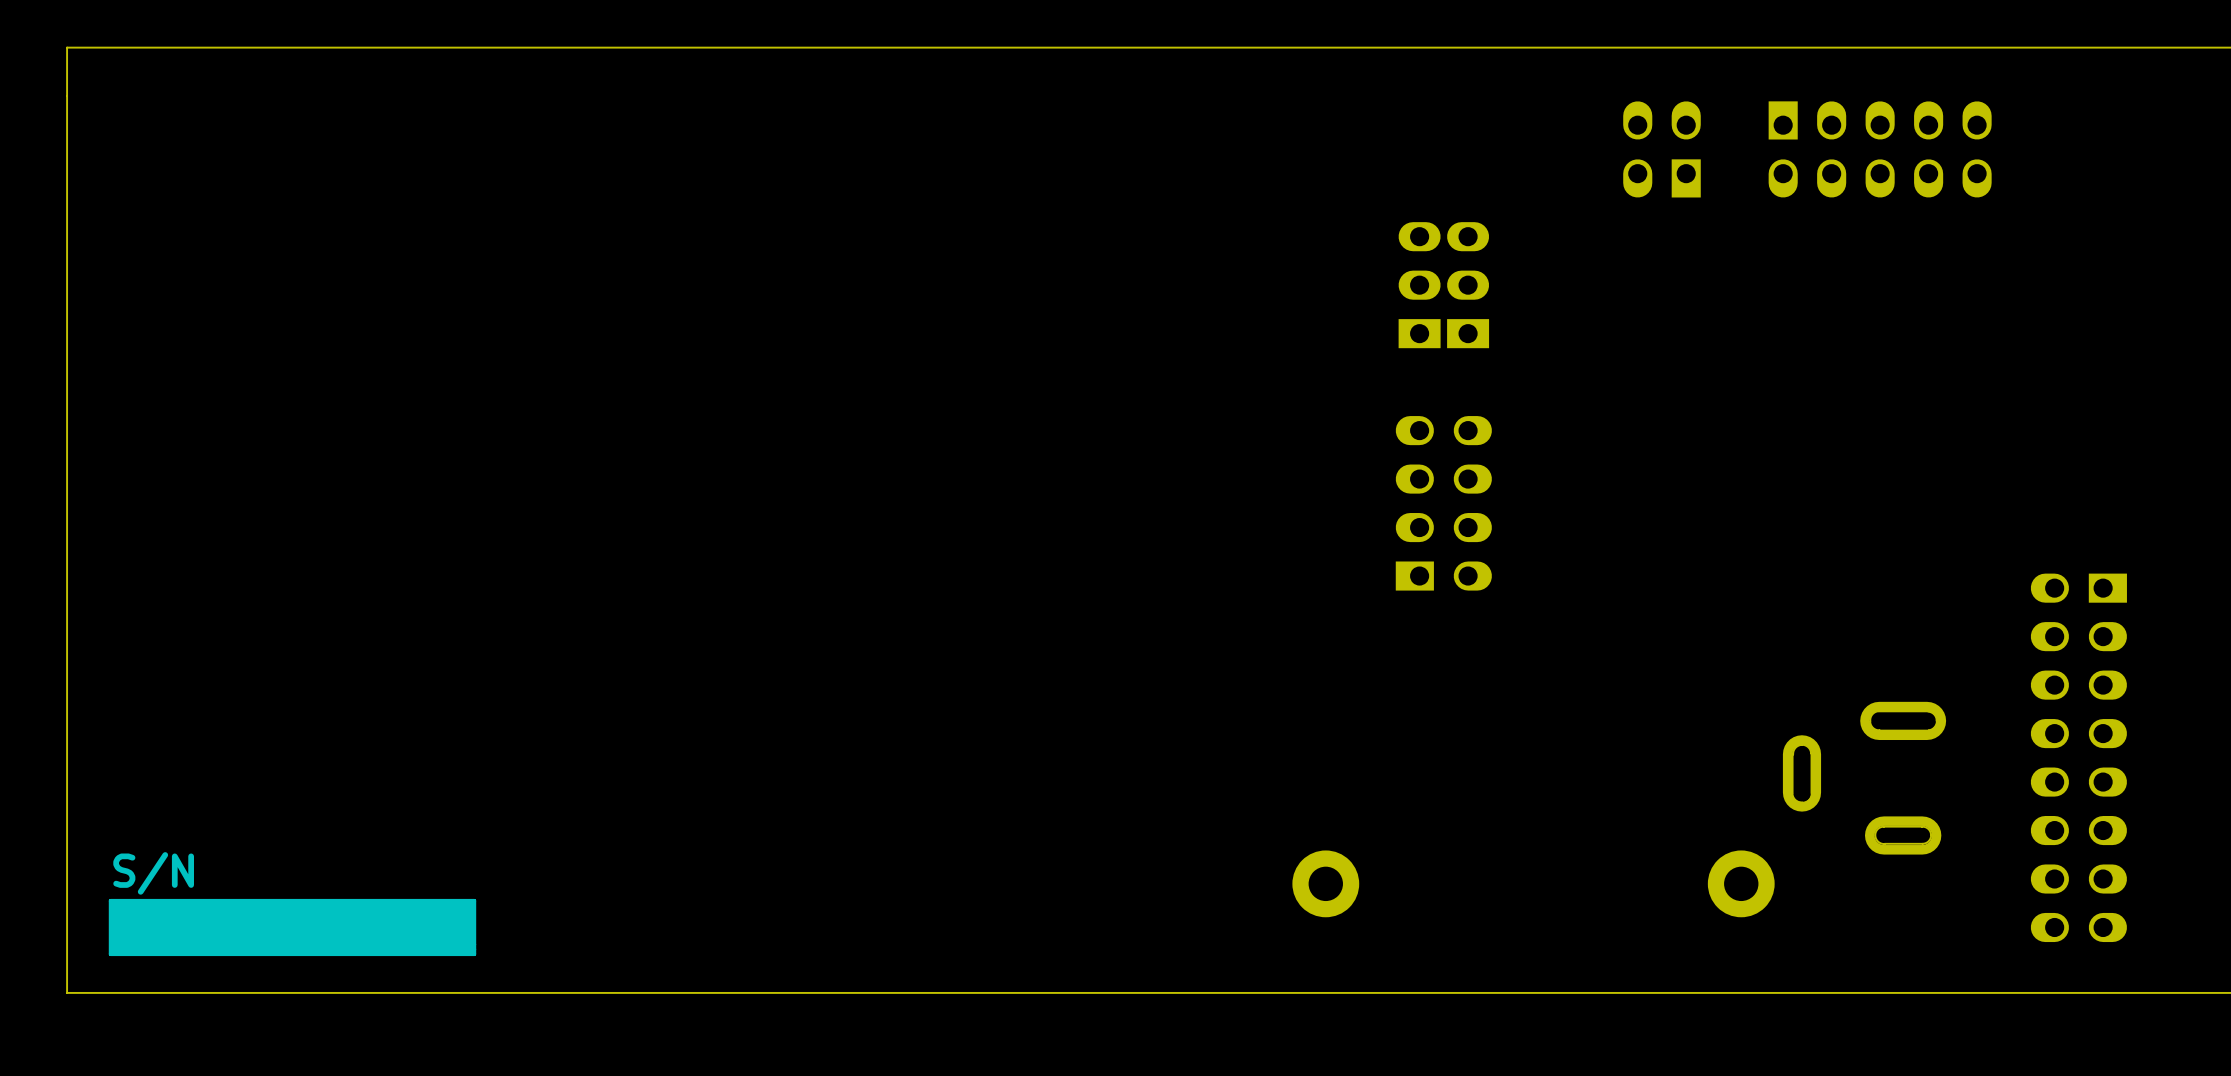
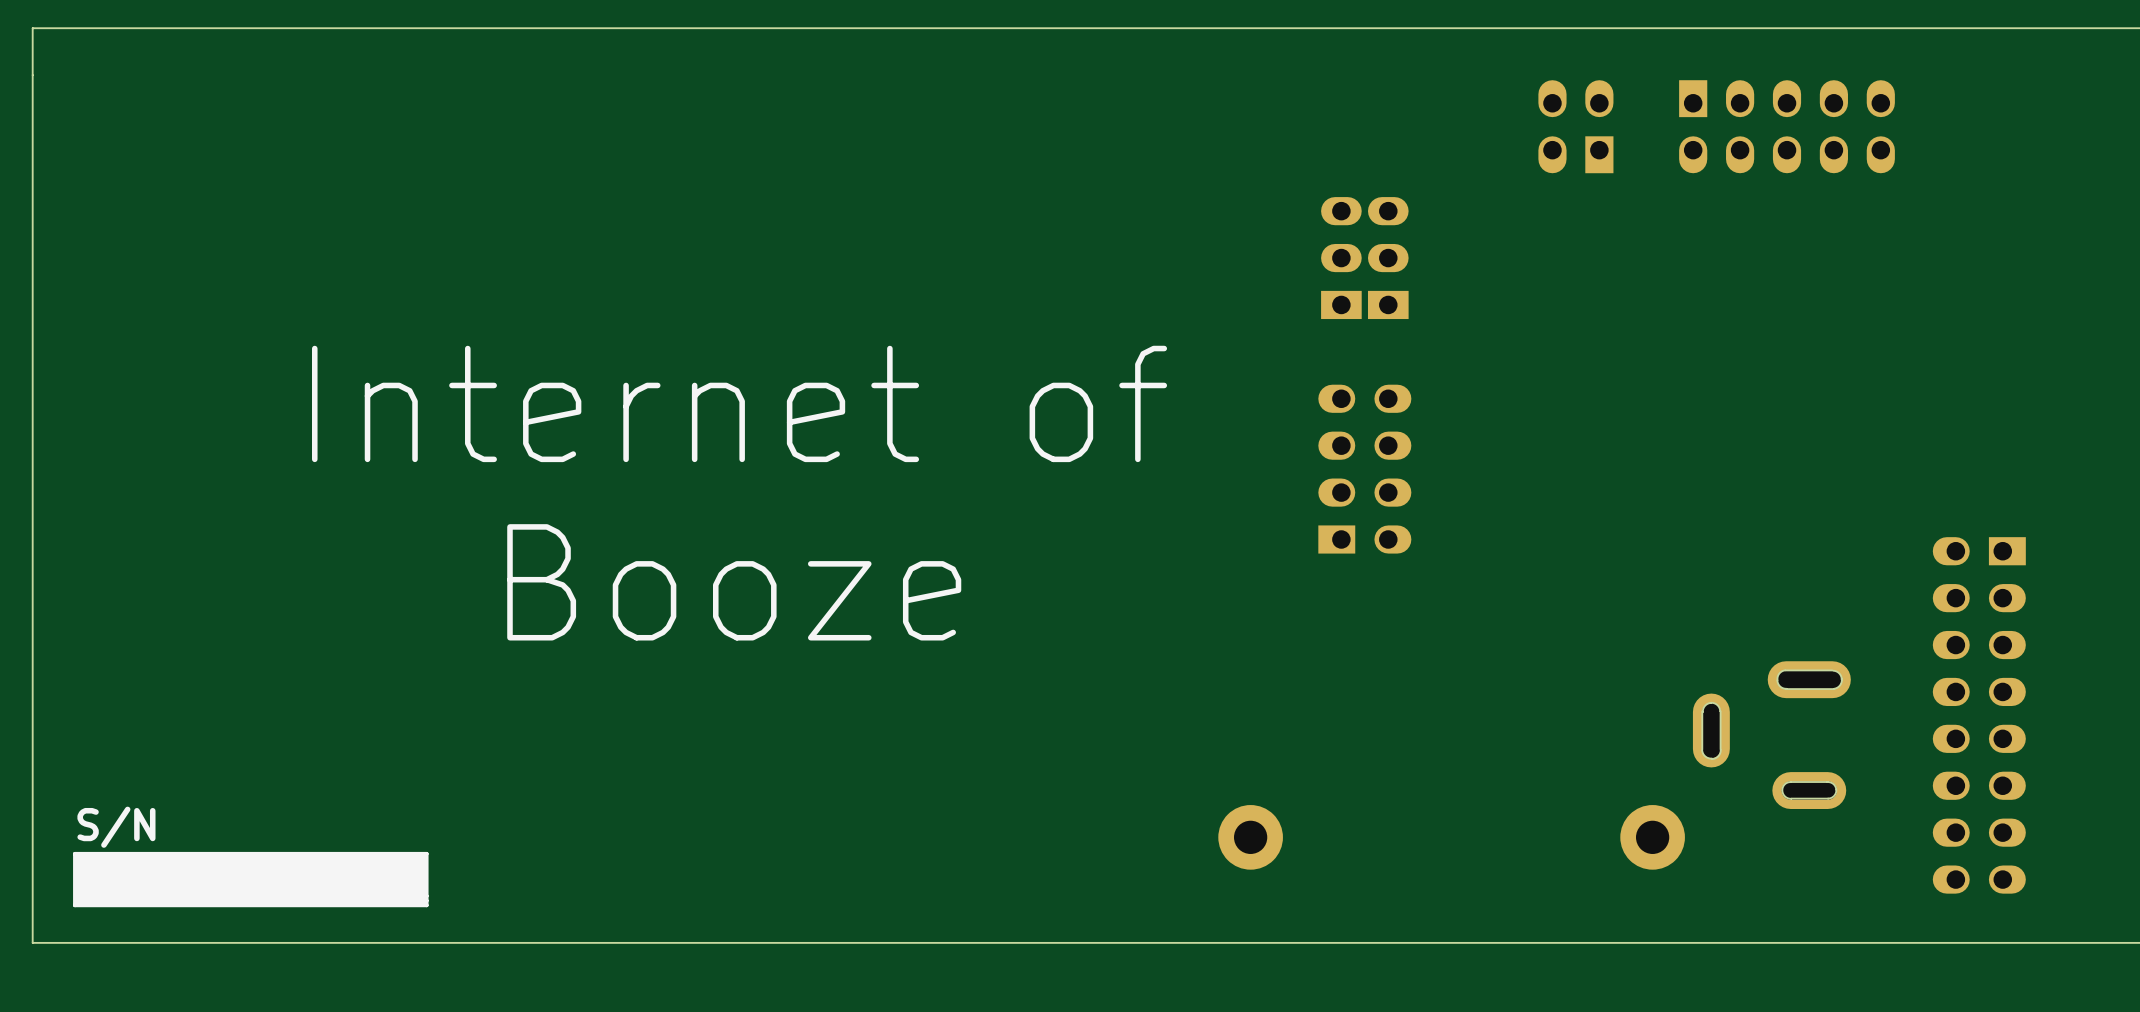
text: none -> Internet of (739, 403)
text: none -> Booze (734, 582)

